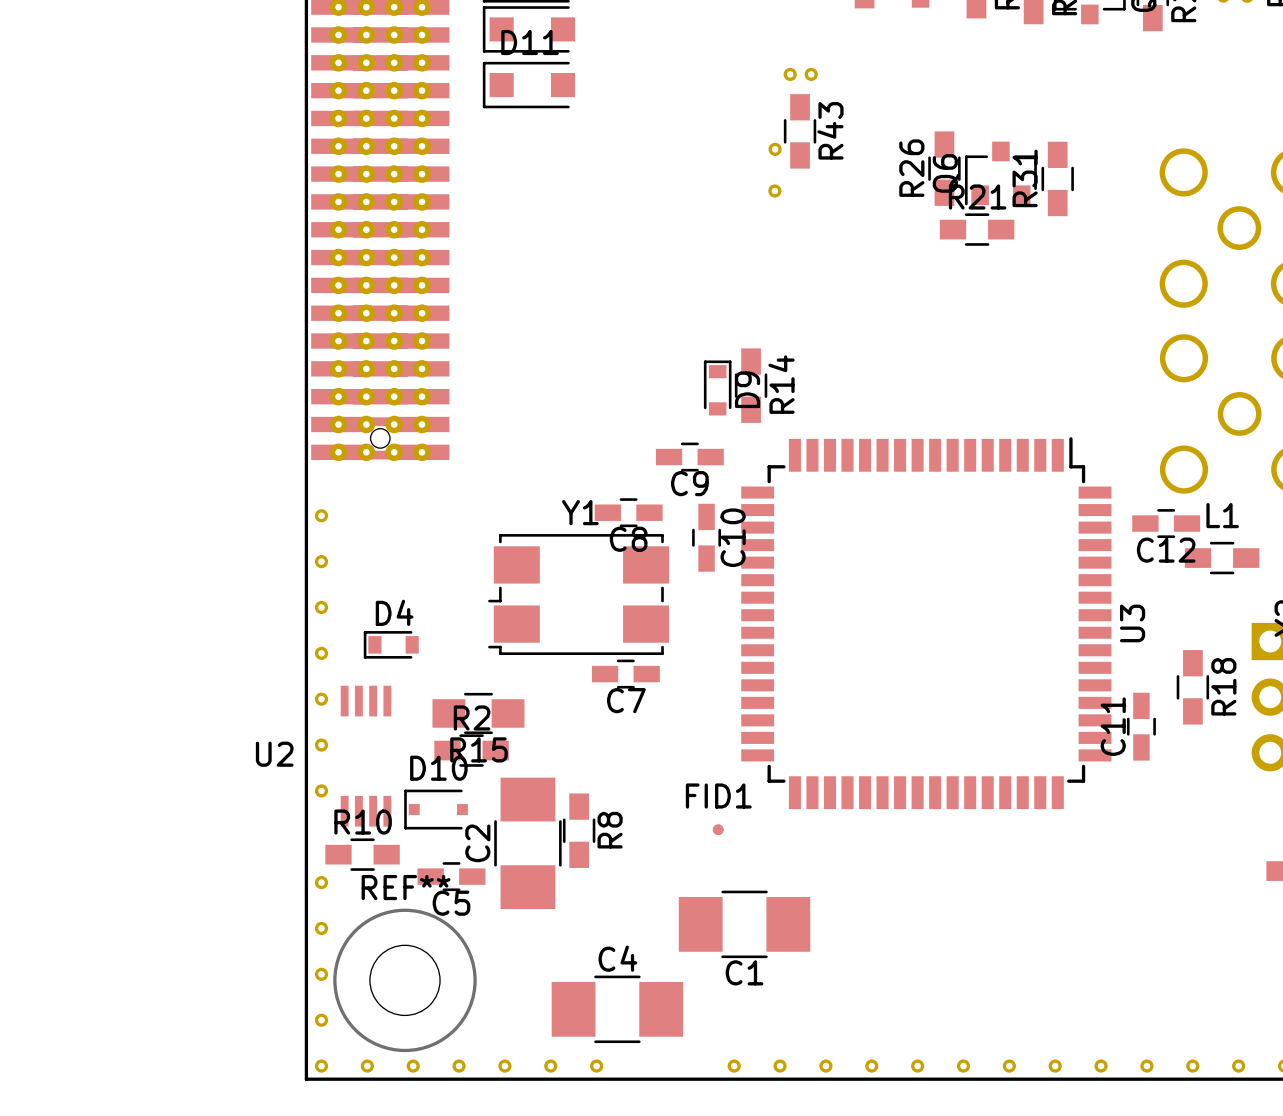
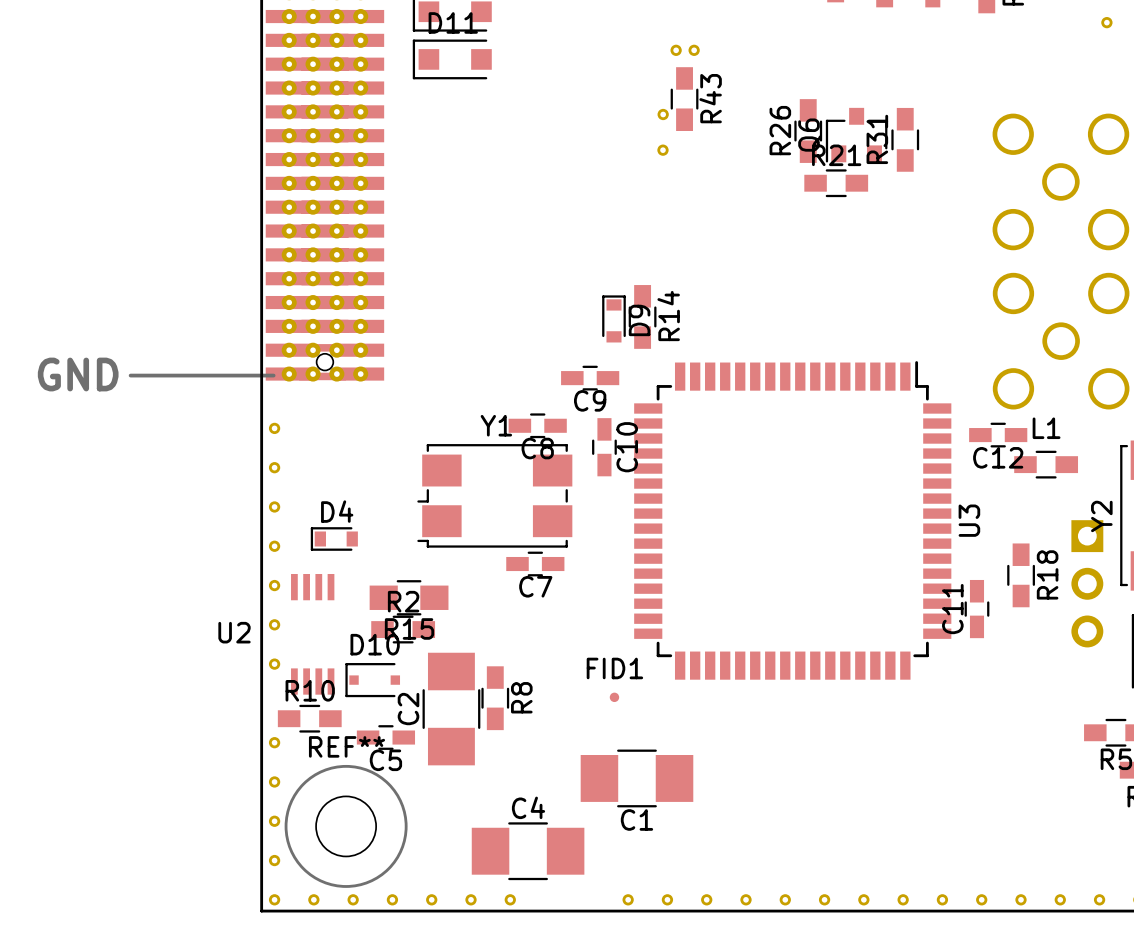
text: none -> GND (78, 374)
line: none -> (130, 375) (273, 375)

